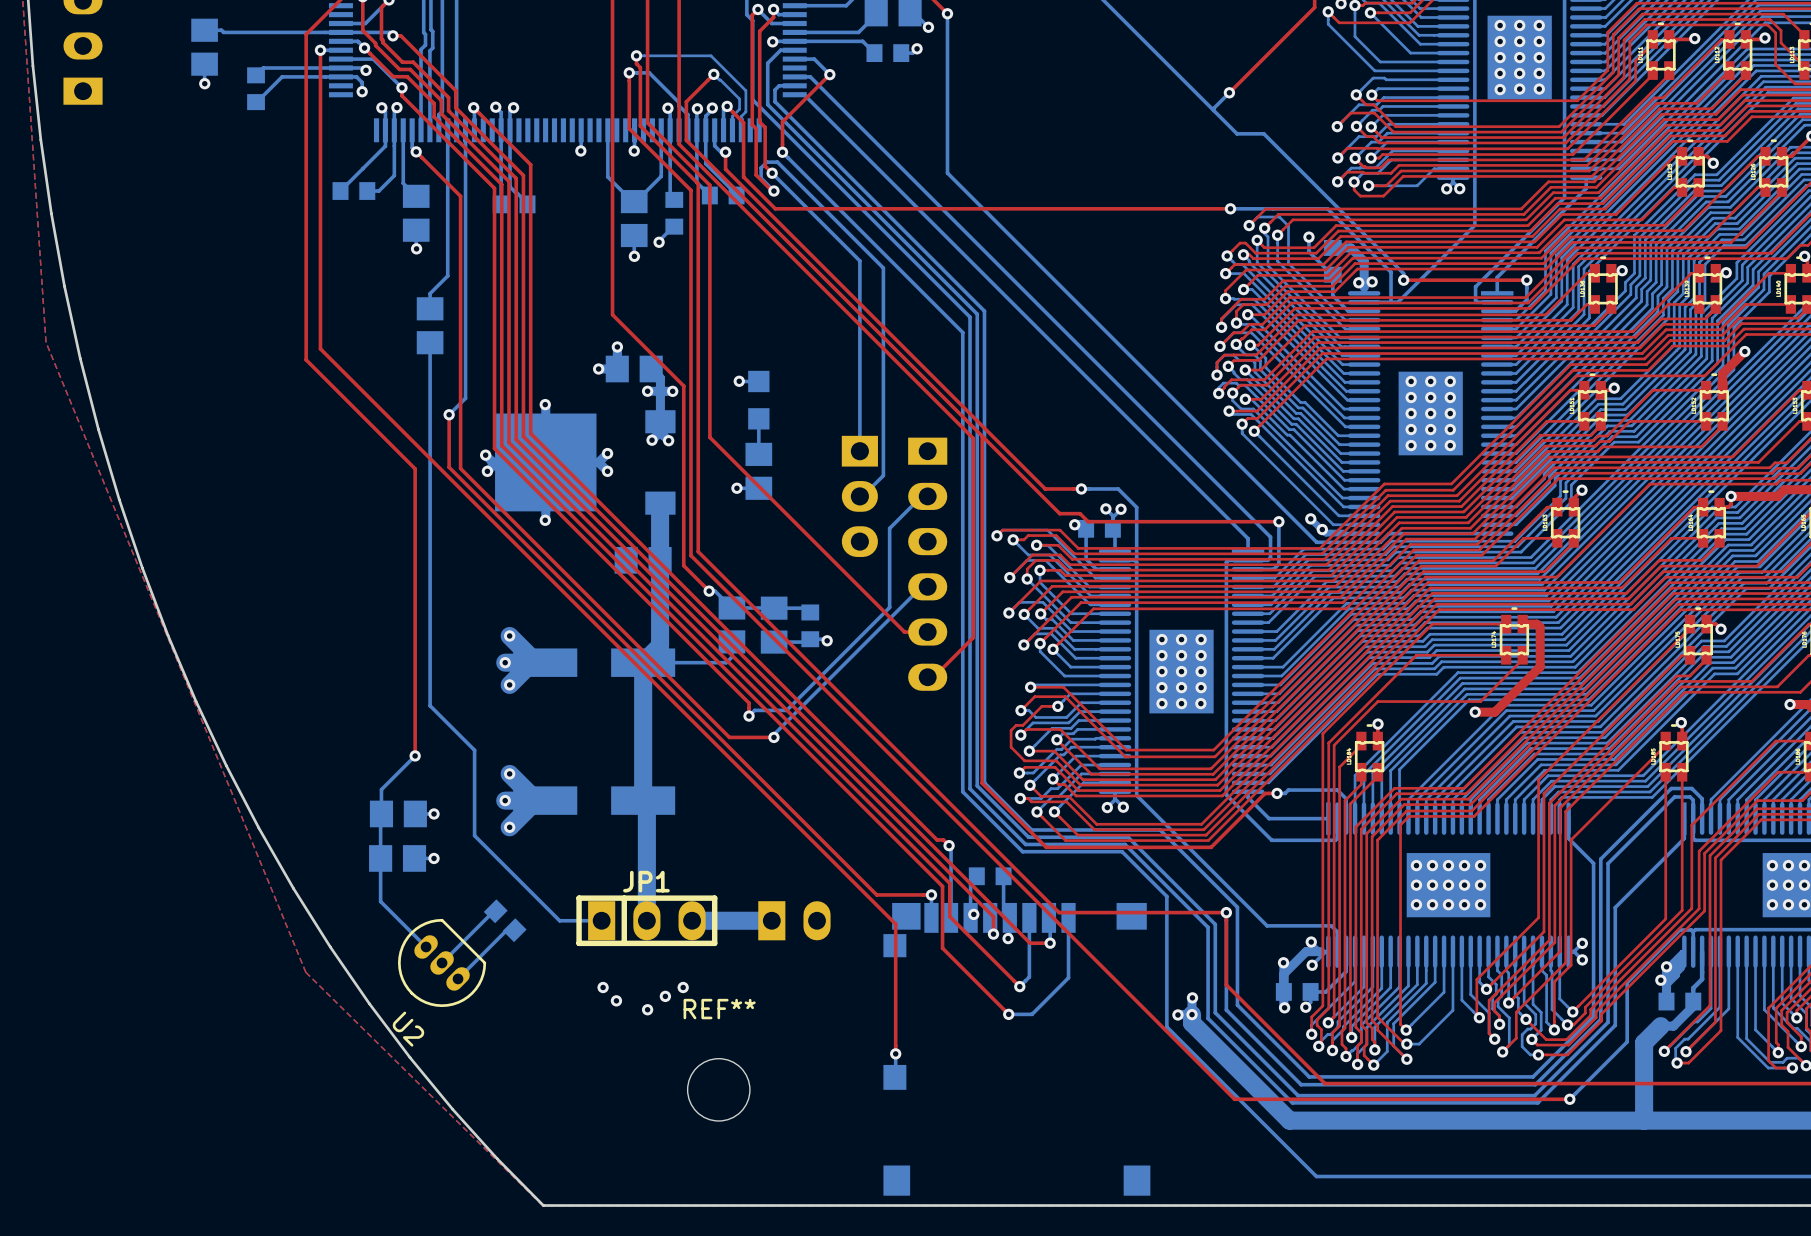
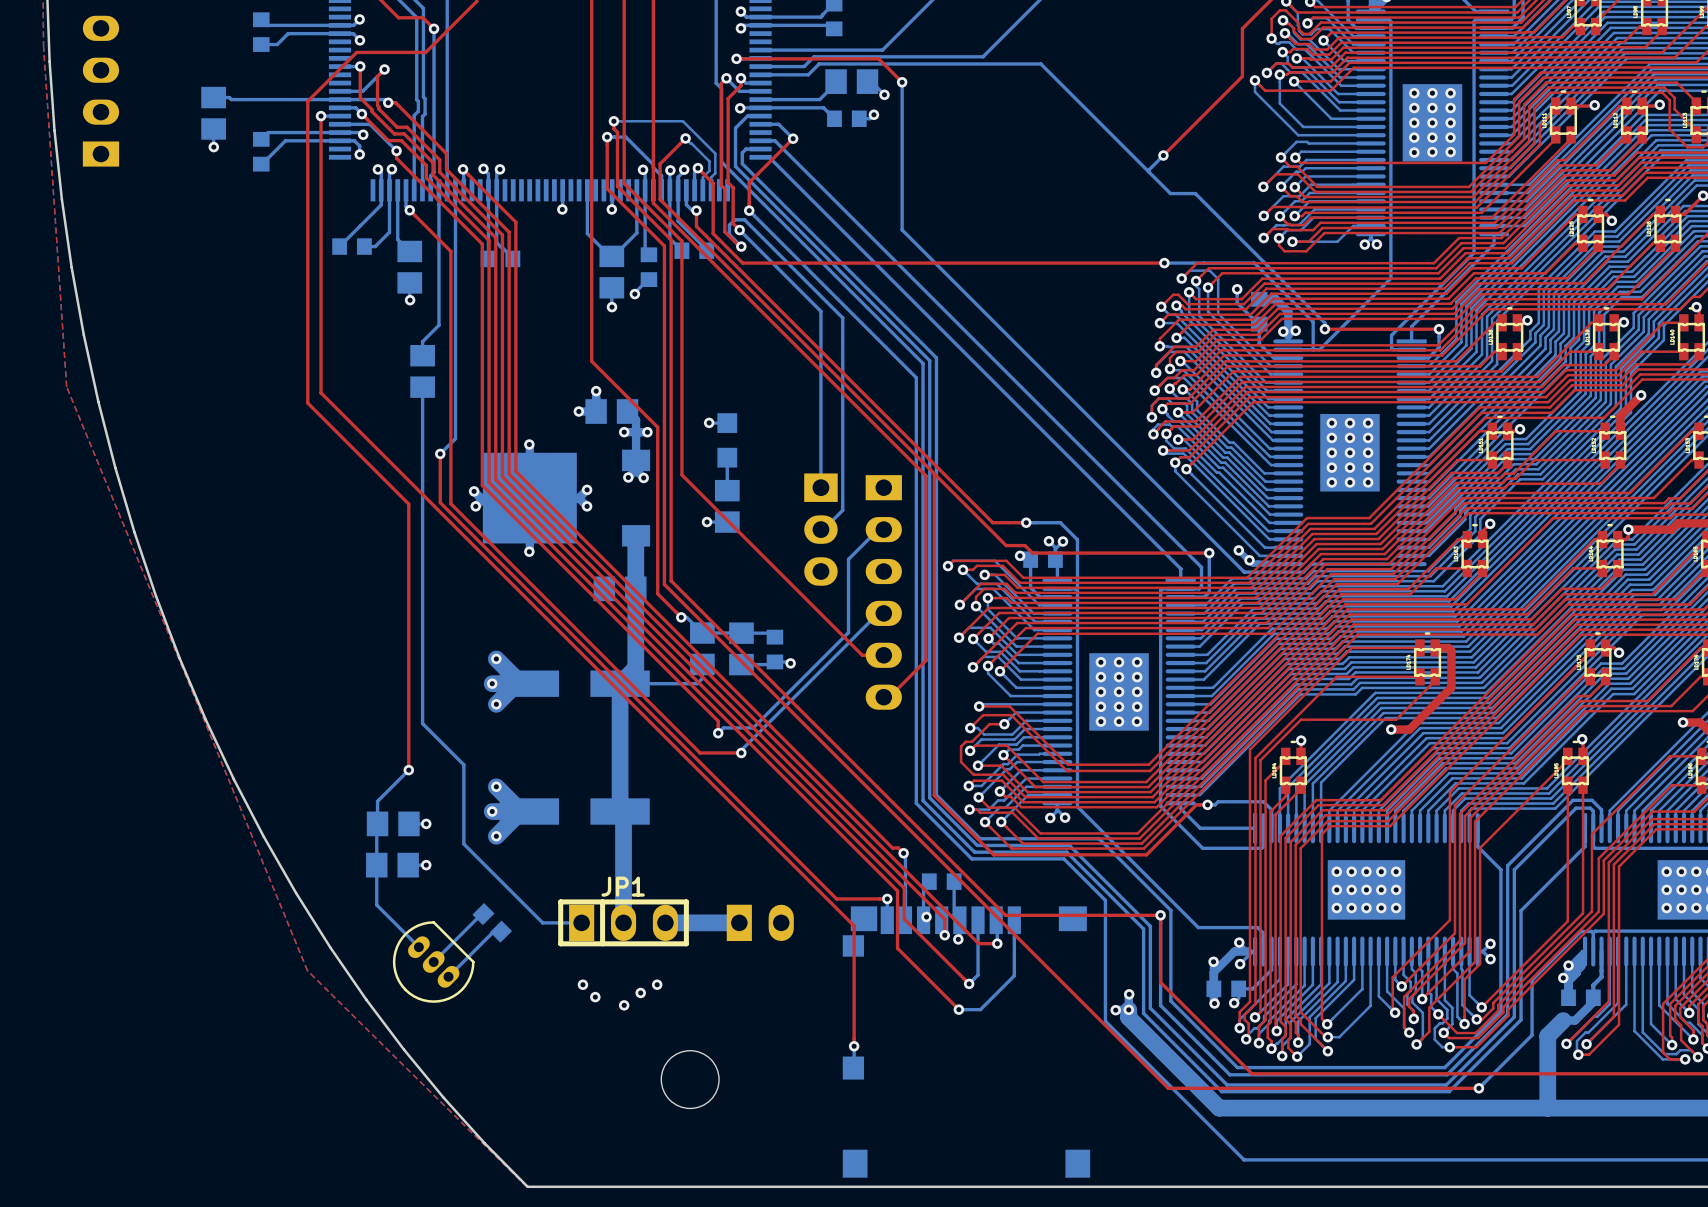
REF** name: REF** (719, 1009) -> none
U2 name: U2 (408, 1029) -> none

